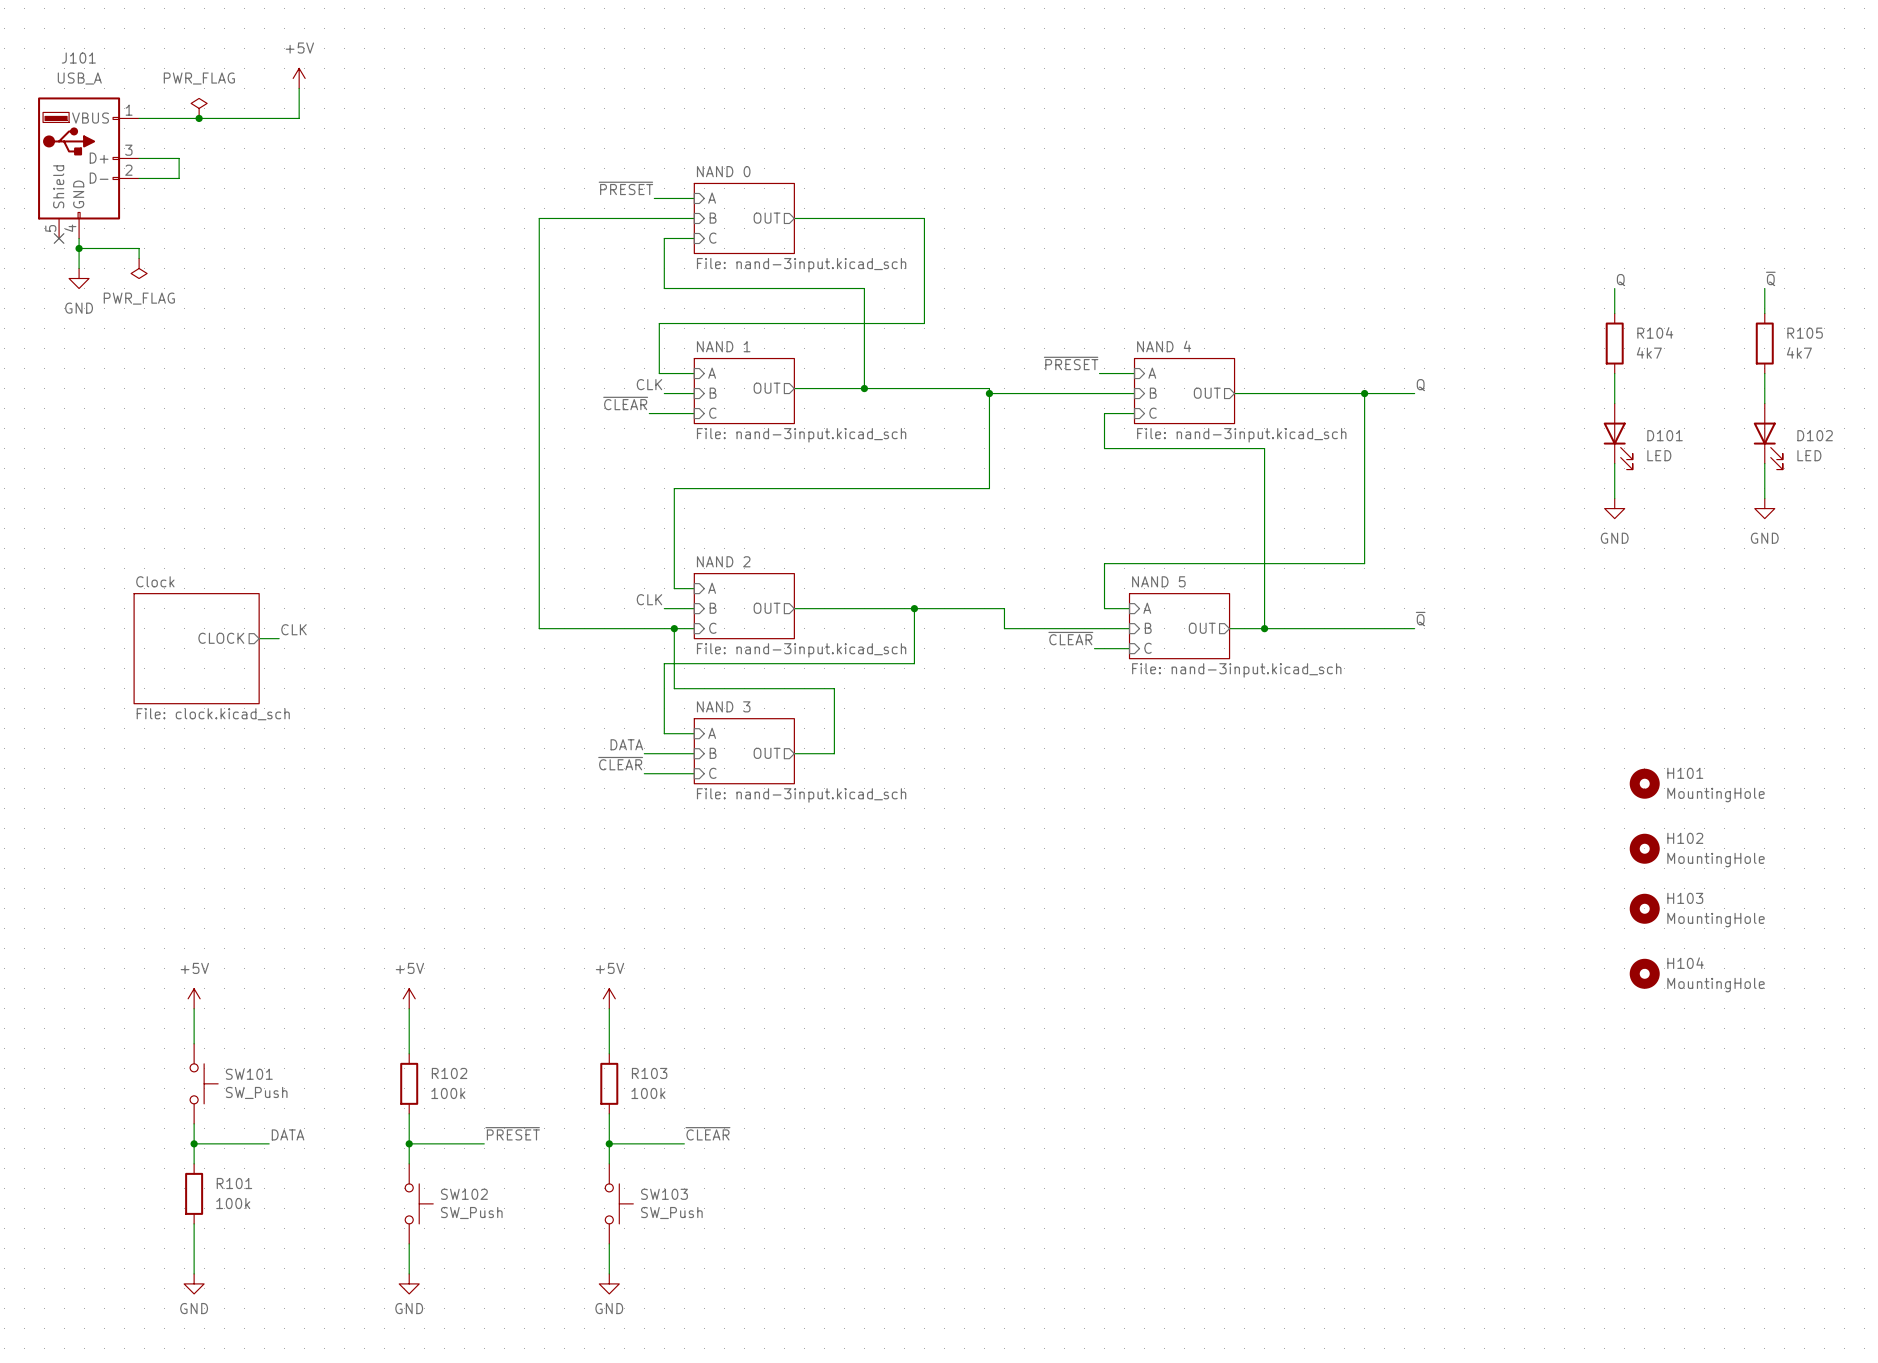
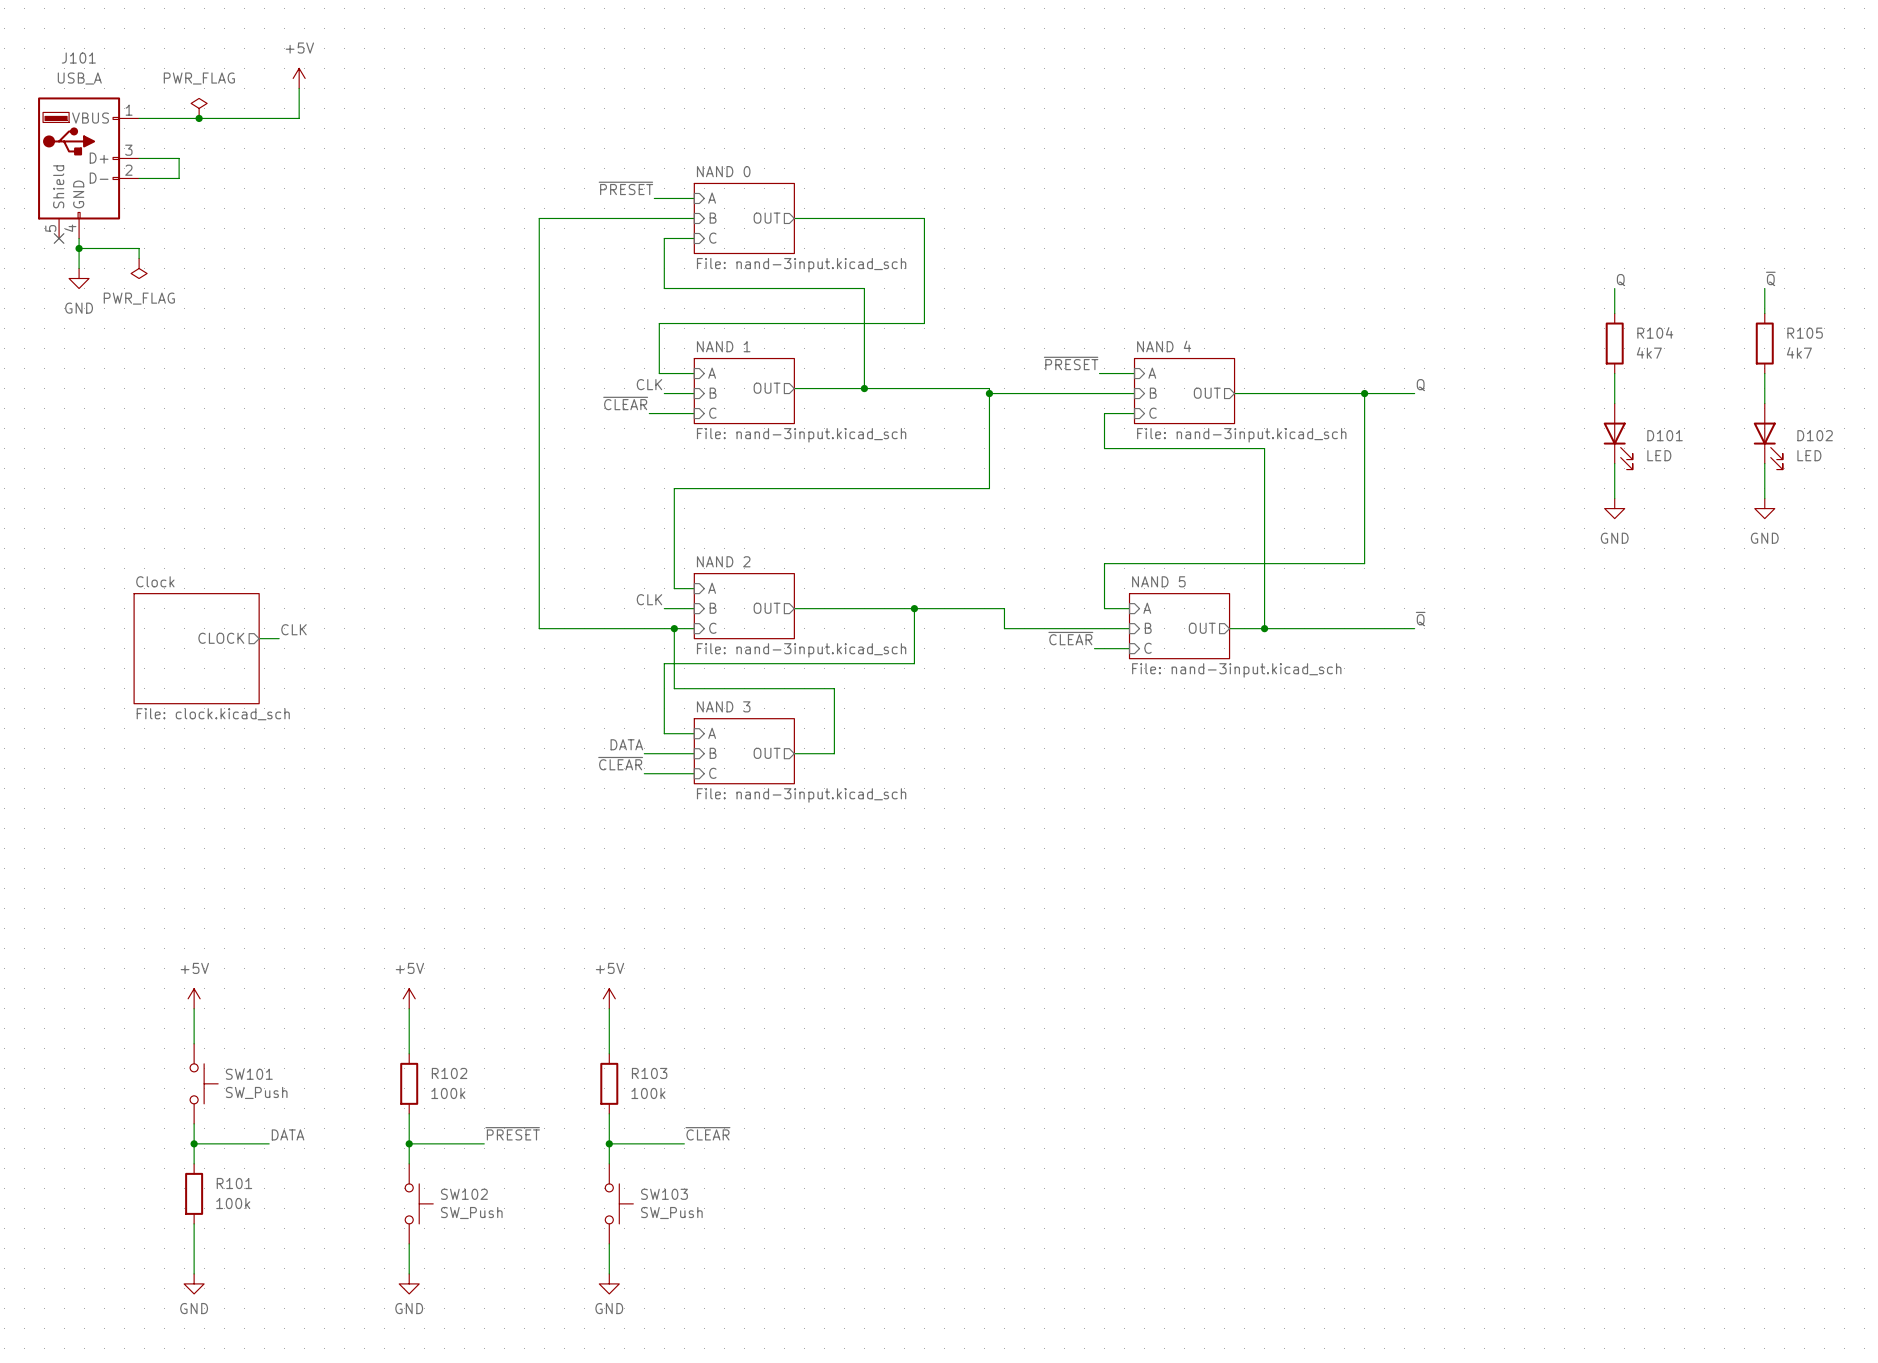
H101: MountingHole (1644, 783) -> none
H102: MountingHole (1644, 848) -> none
H103: MountingHole (1644, 908) -> none
H104: MountingHole (1644, 973) -> none

